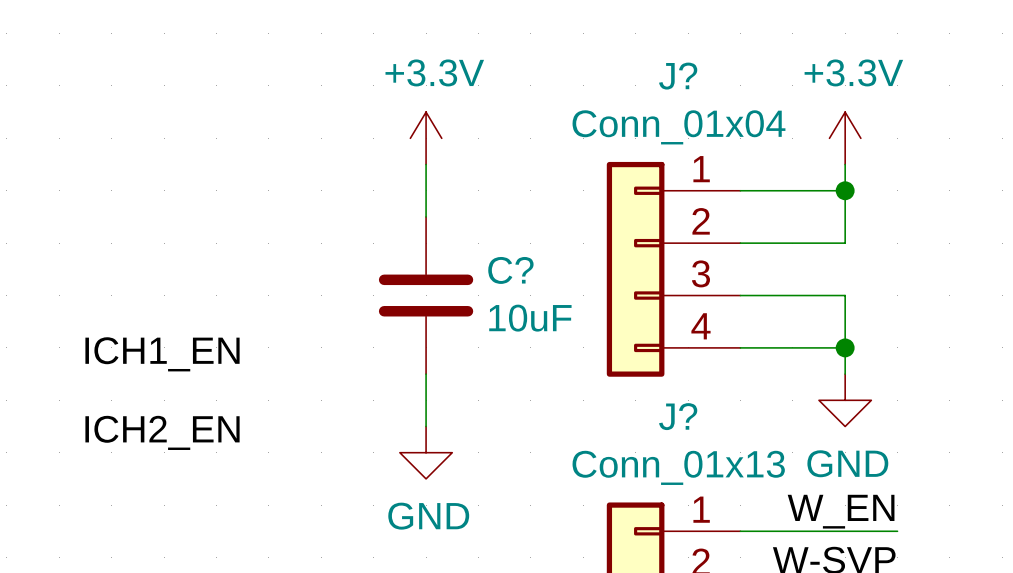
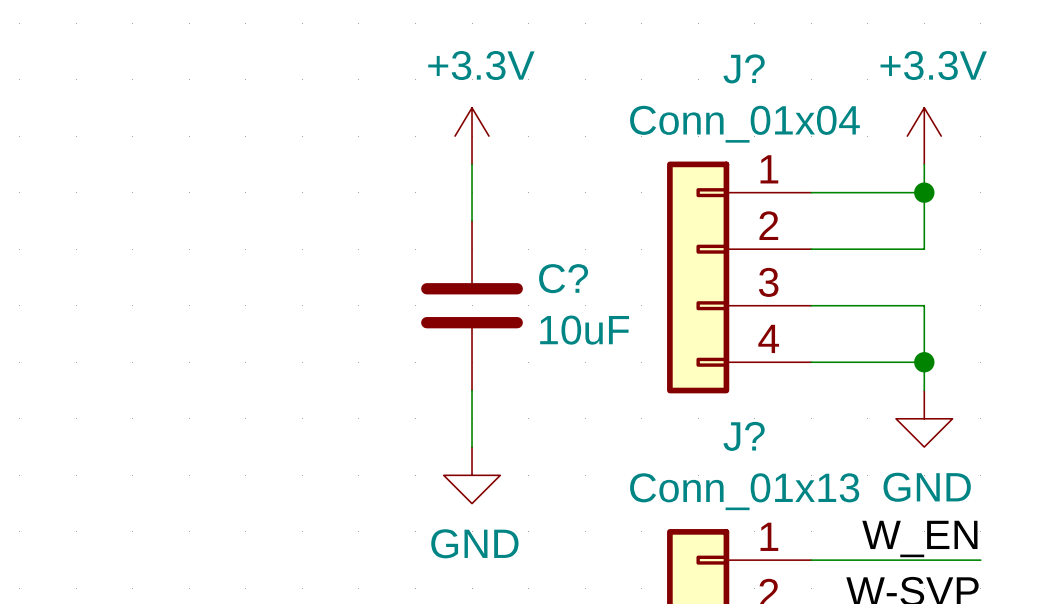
label: ICH1_EN (162, 354) -> none
label: ICH2_EN (162, 432) -> none

